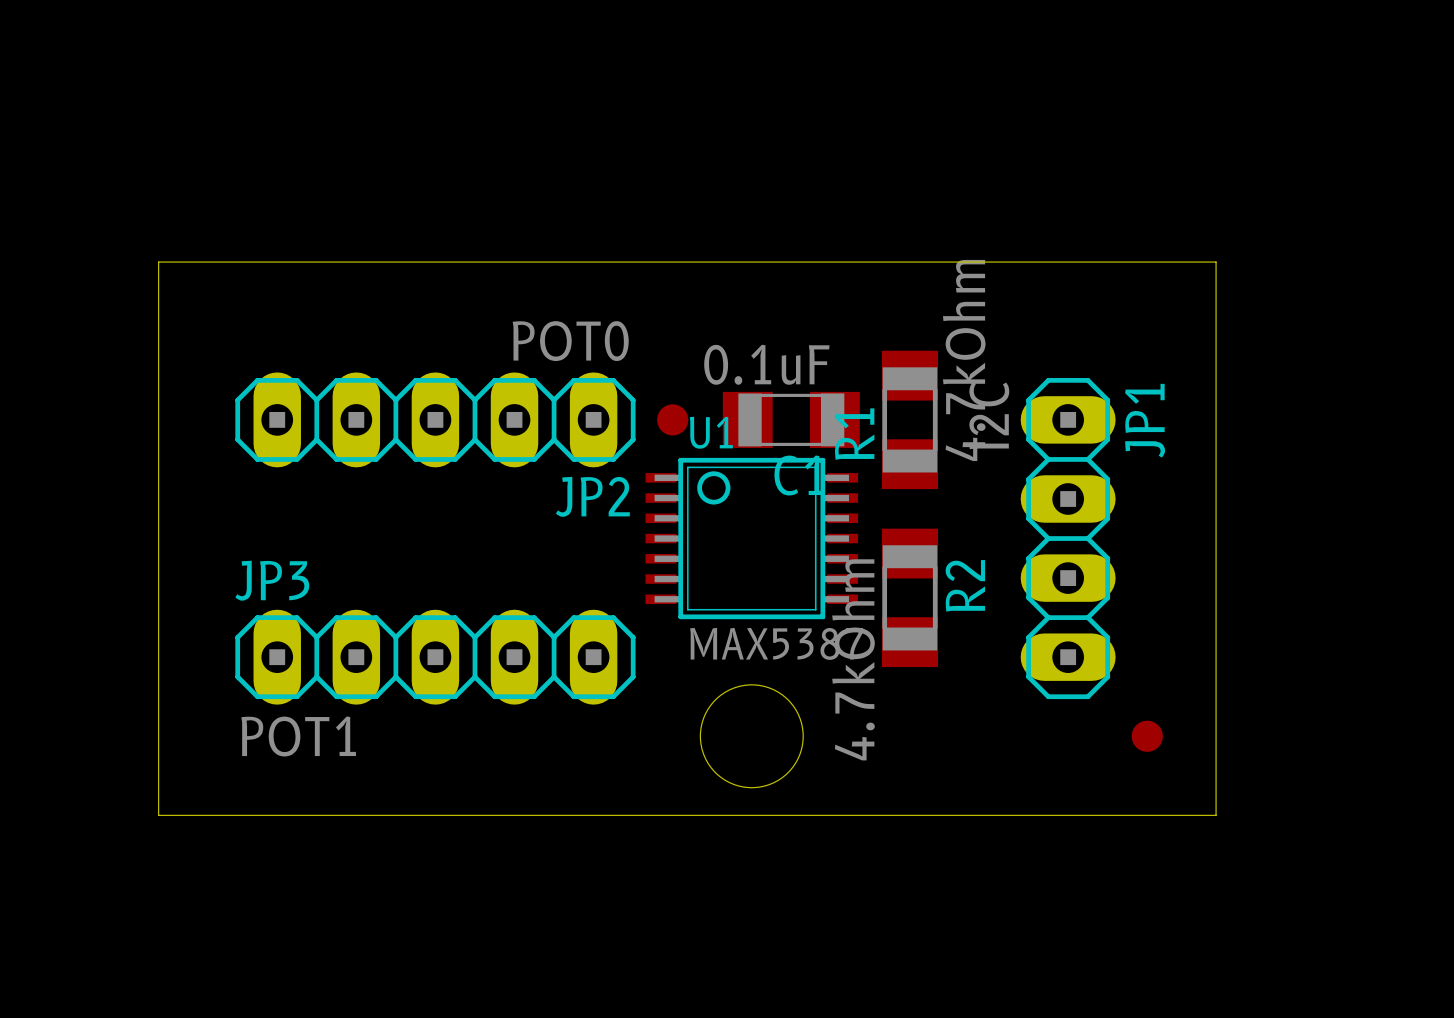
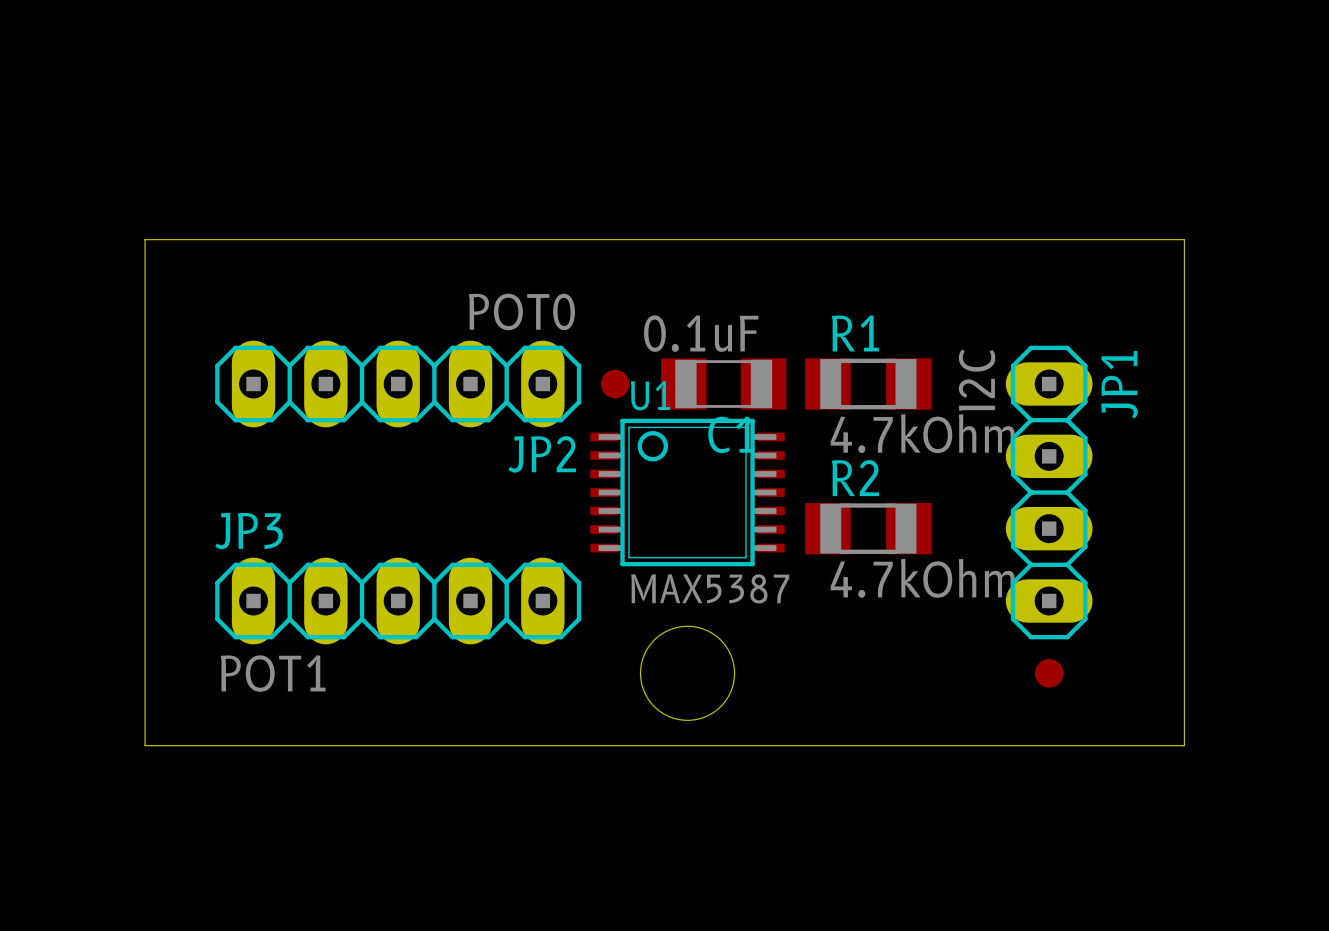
board edge: (1216, 262) (1216, 815) -> (1112, 239) (1184, 239) (1184, 745) (1112, 745)
R1 rotation: 0° (909, 419) -> 90° clockwise (868, 384)
JP1 position: (1068, 538) -> (1049, 492)
R2 name position: R2 (965, 585) -> R2 (855, 478)
R2 rotation: 0° (909, 597) -> 90° clockwise (868, 528)
R2 value position: 4.7kOhm (853, 659) -> 4.7kOhm (922, 578)

